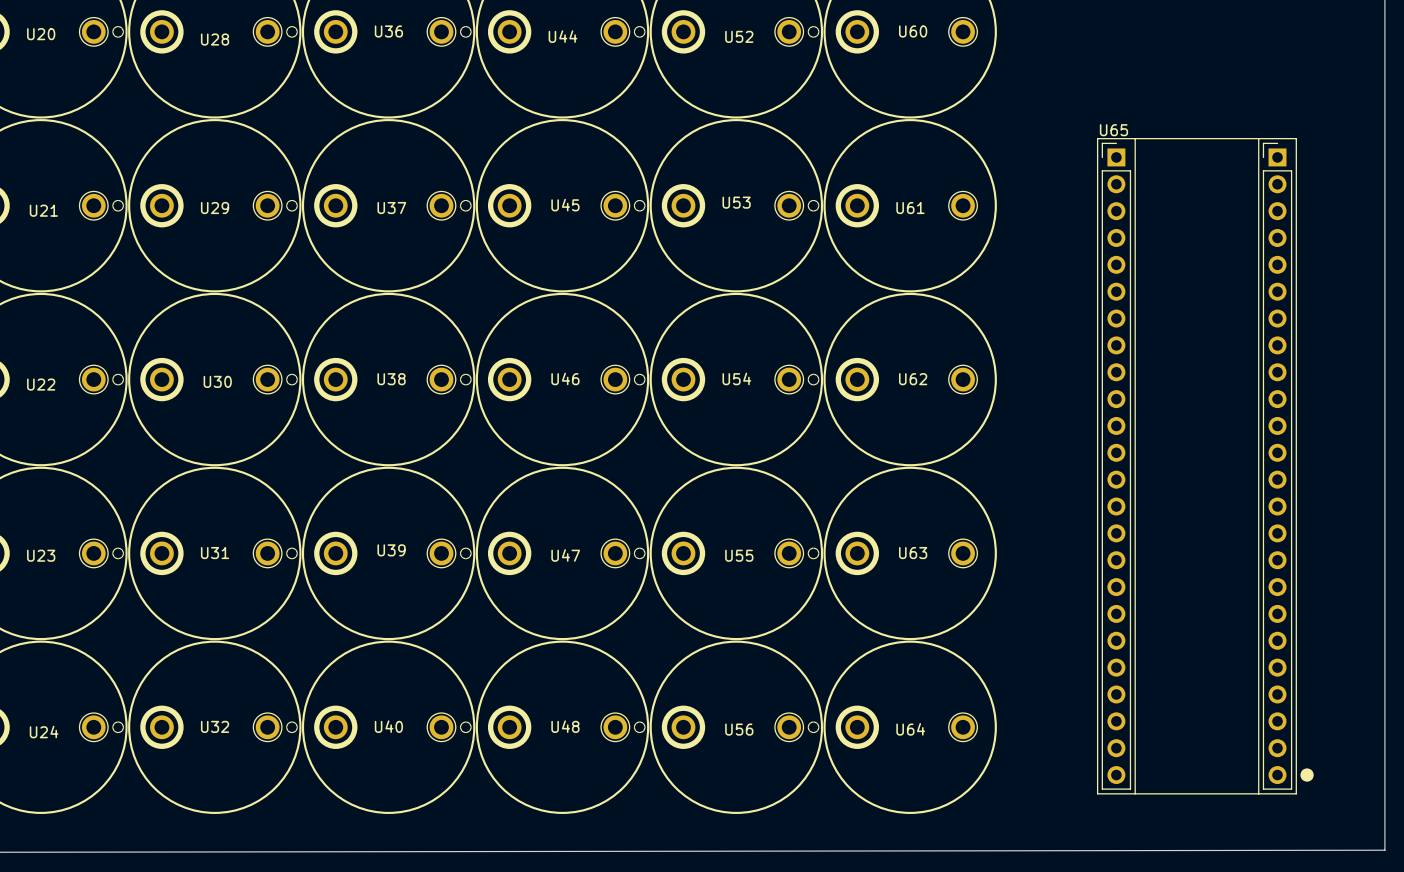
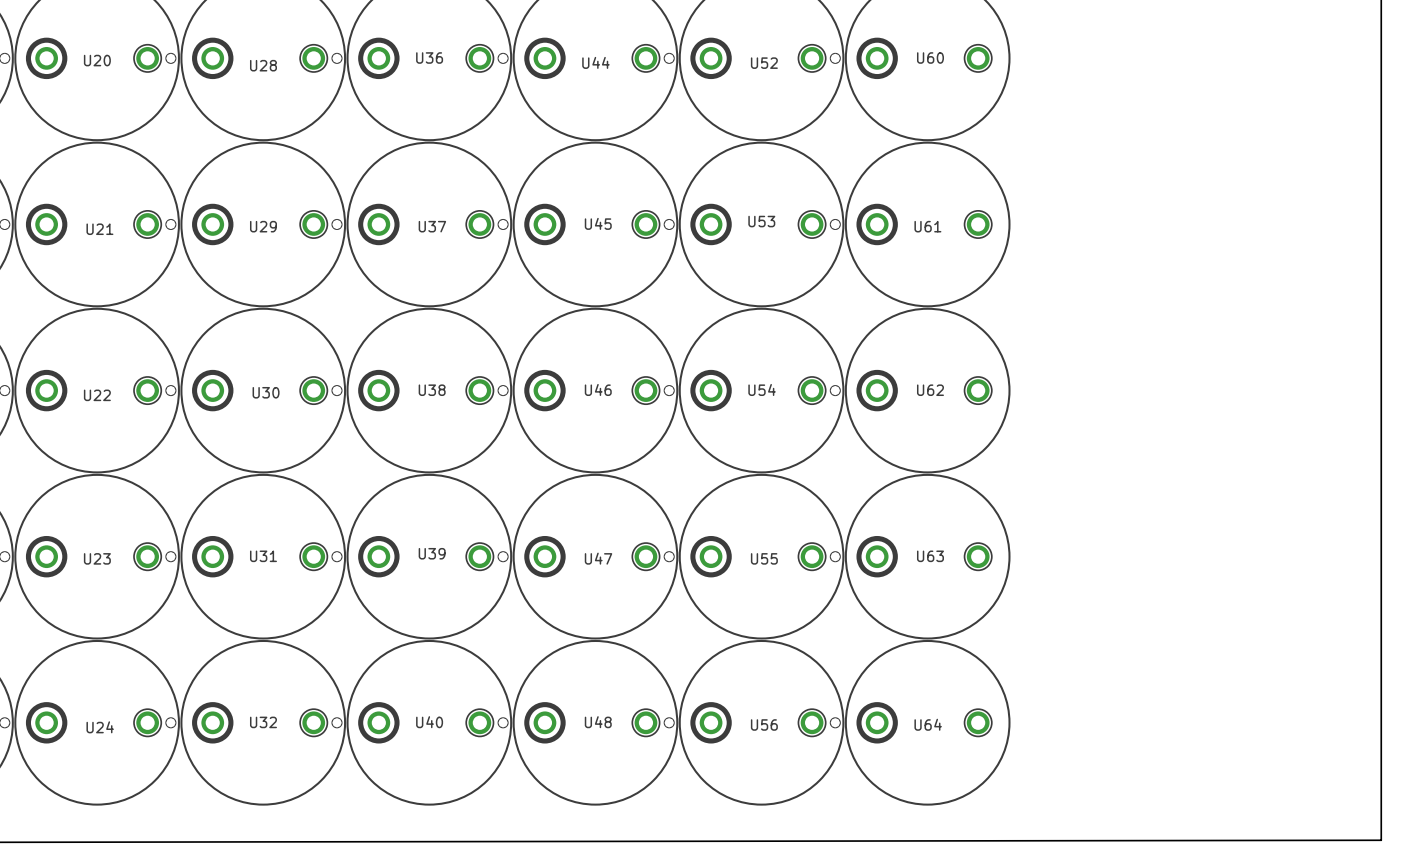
line: (1097, 138) (1097, 793) (1296, 793) (1296, 138) (1097, 138) -> none
line: (1135, 138) (1135, 793) -> none
line: (1258, 138) (1258, 793) -> none
U65: (1207, 466) -> none

